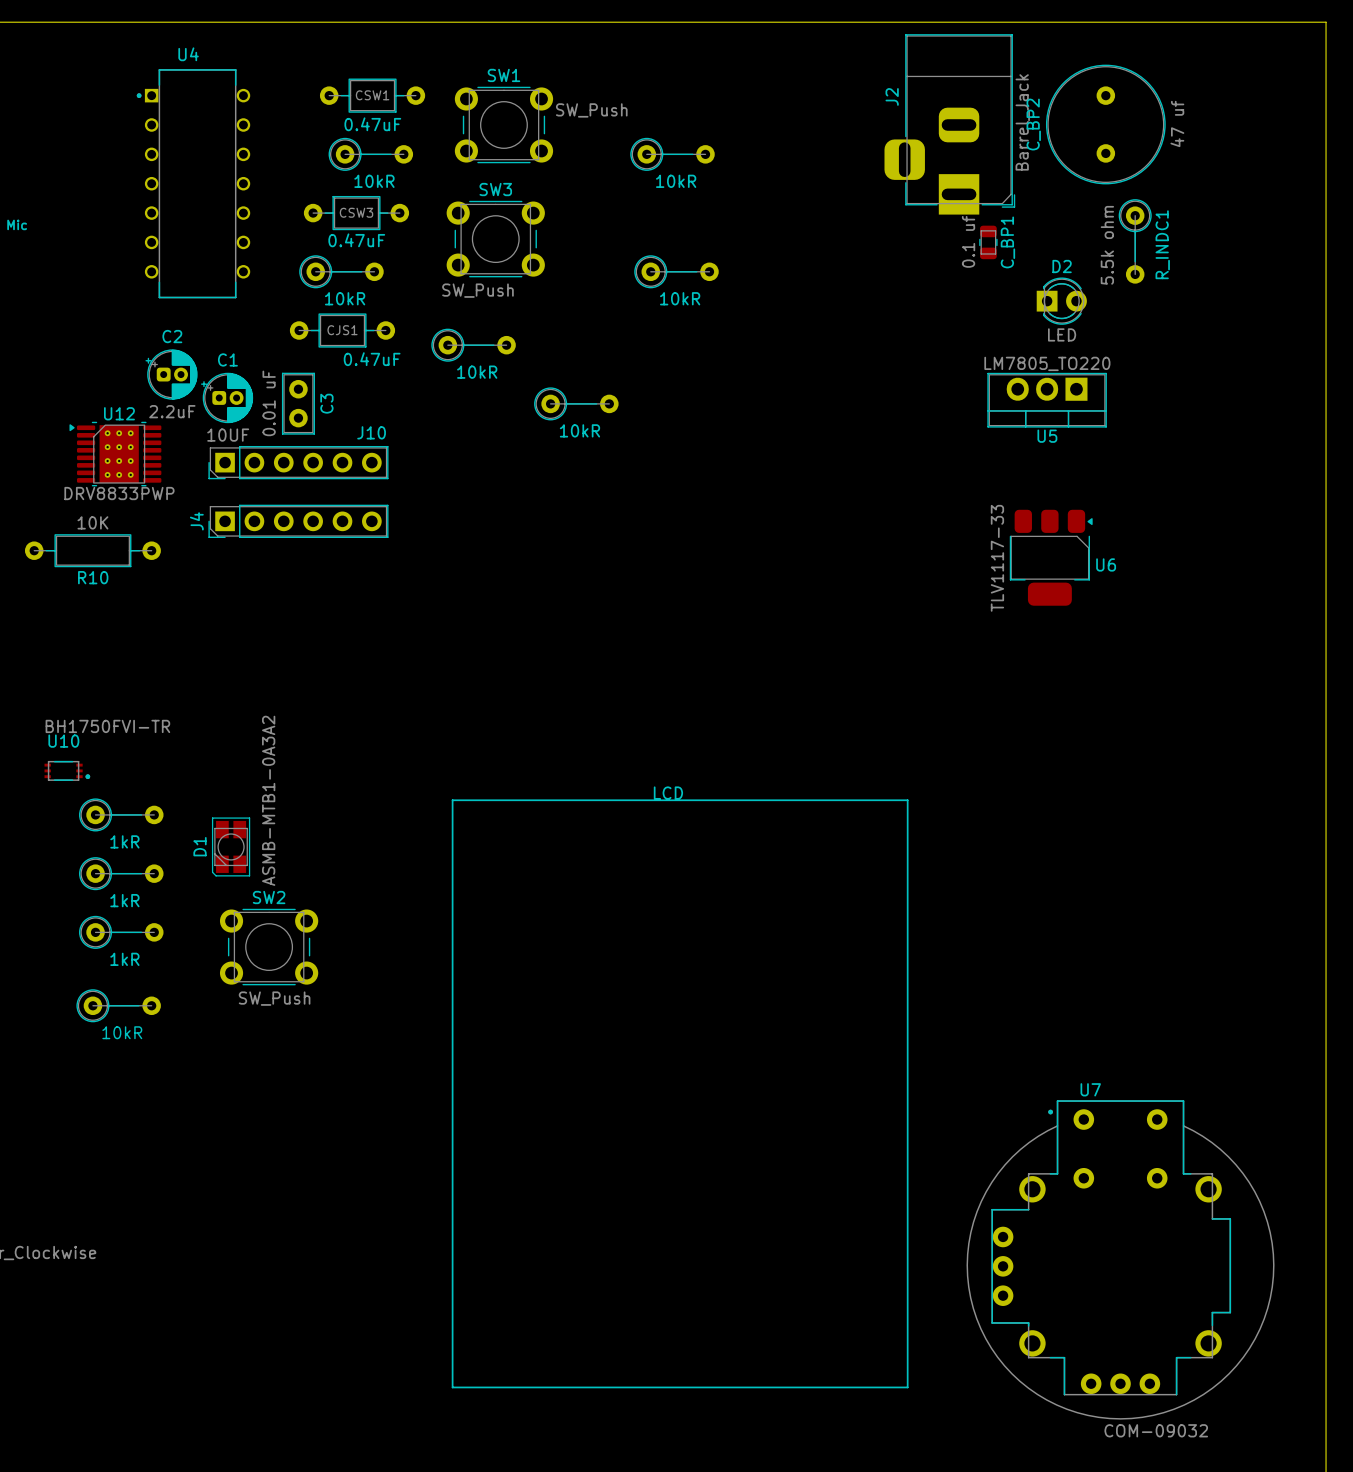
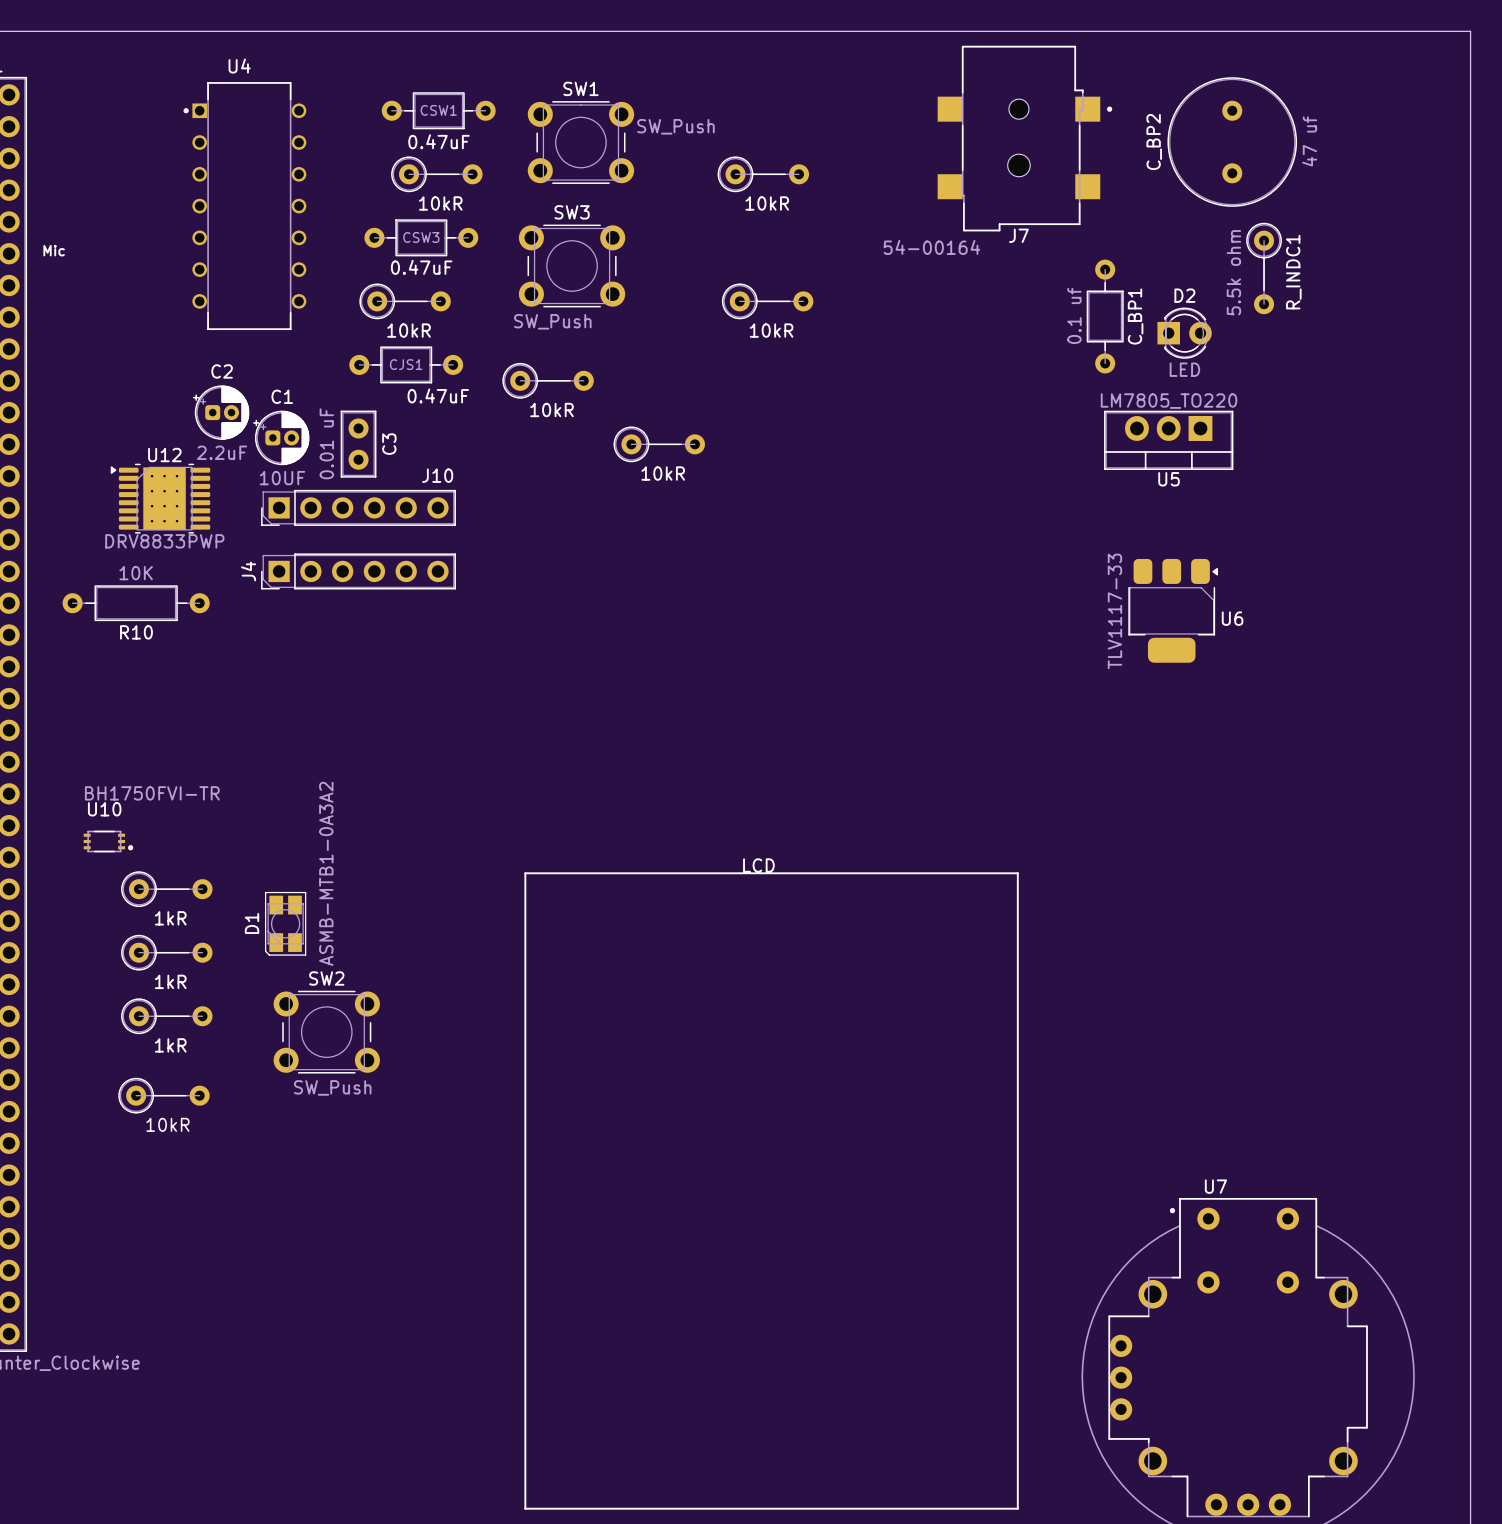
J7: none -> 54-00164 (1024, 138)
J2: Barrel_Jack (949, 124) -> none
C_BP1 footprint: [979, 225, 998, 260] -> [1086, 259, 1124, 374]

